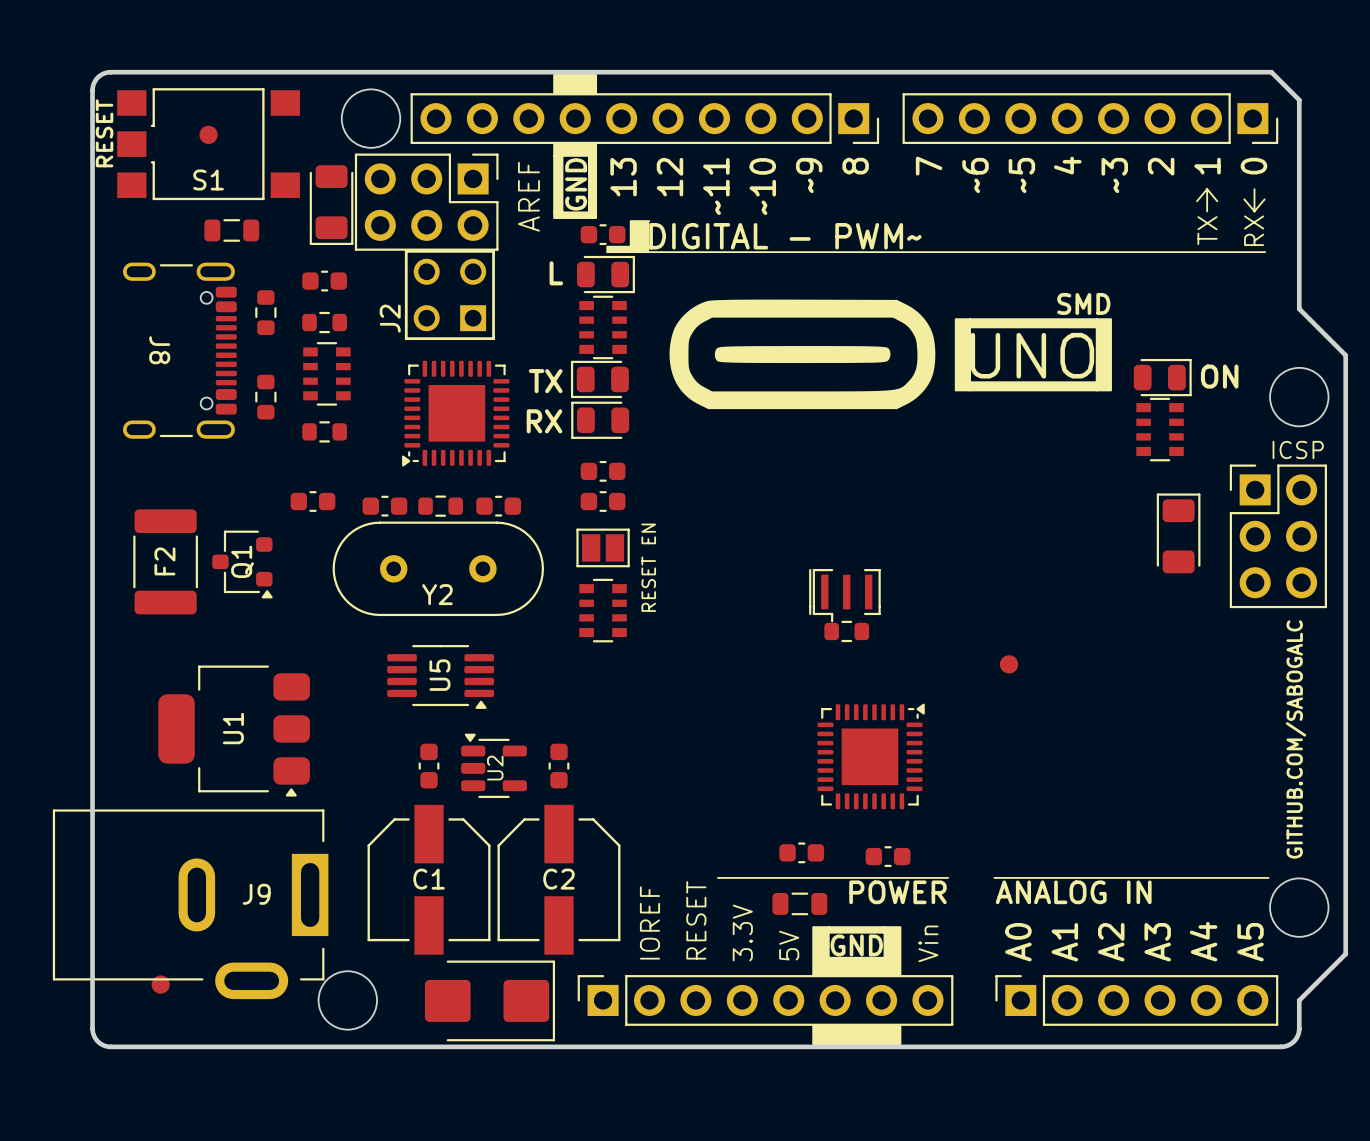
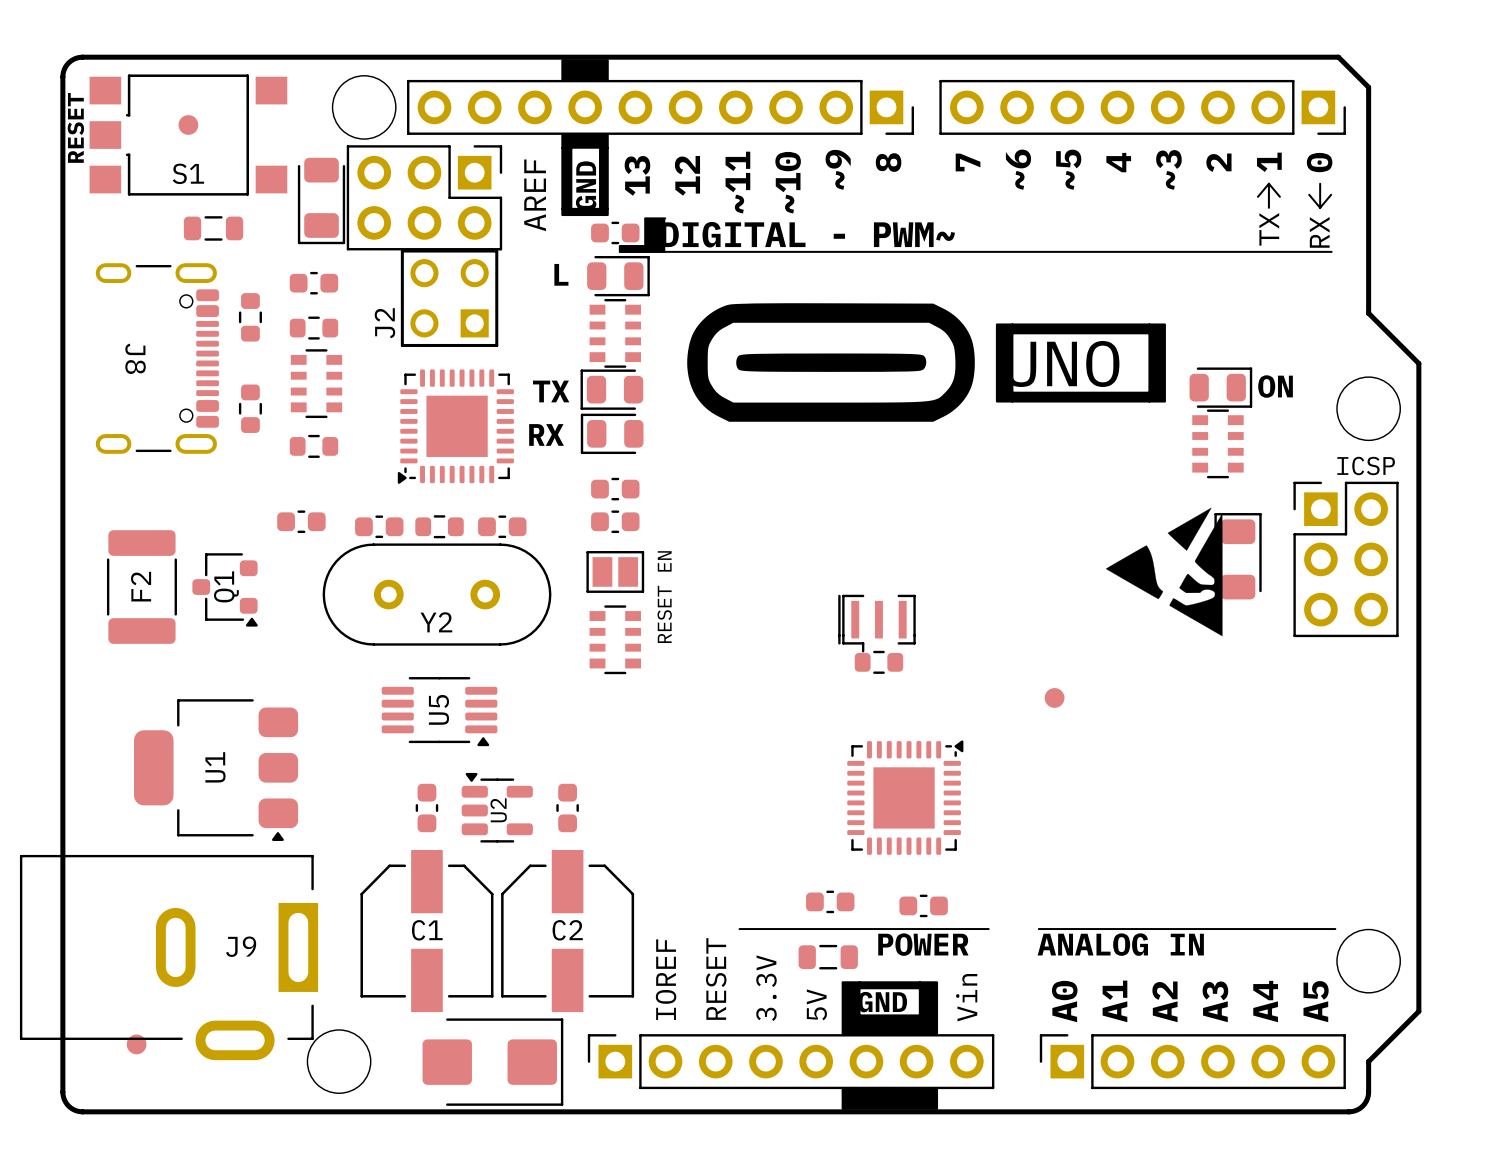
text: SMD (1083, 303) -> none
drawing: none -> [1105, 507, 1223, 637]
text: GITHUB.COM/SABOGALC (1296, 739) -> none

